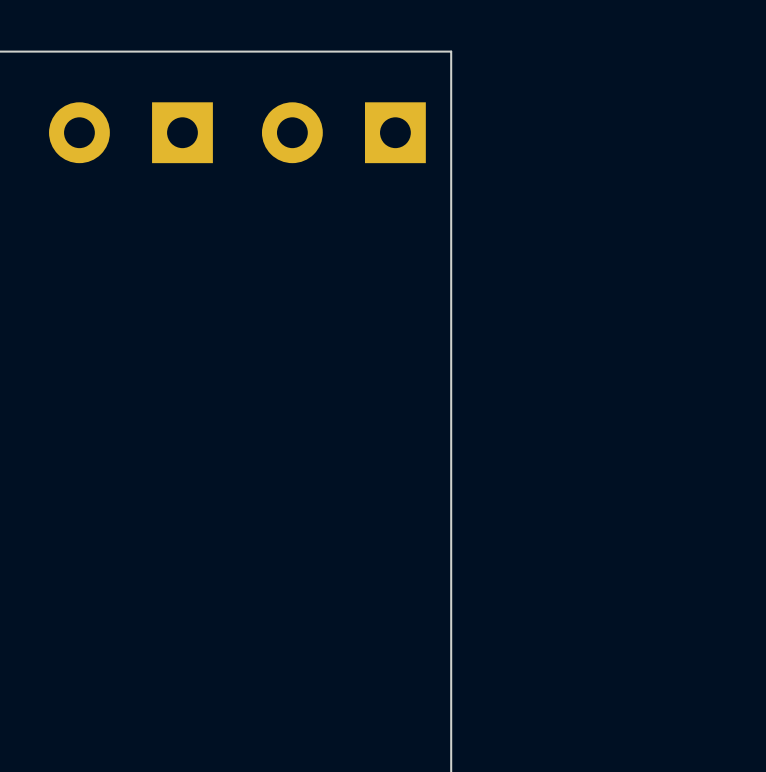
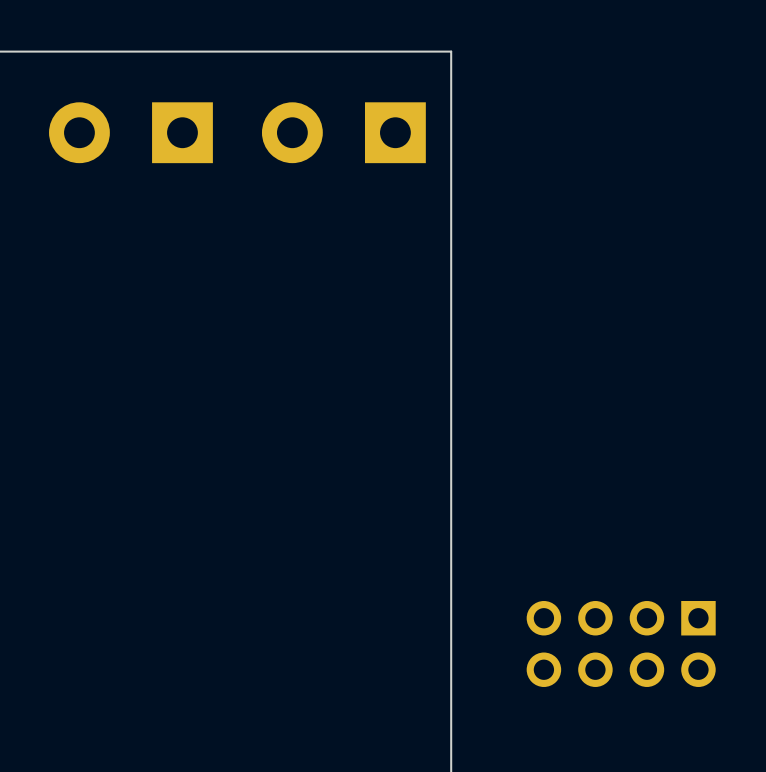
part: none -> (621, 643)

